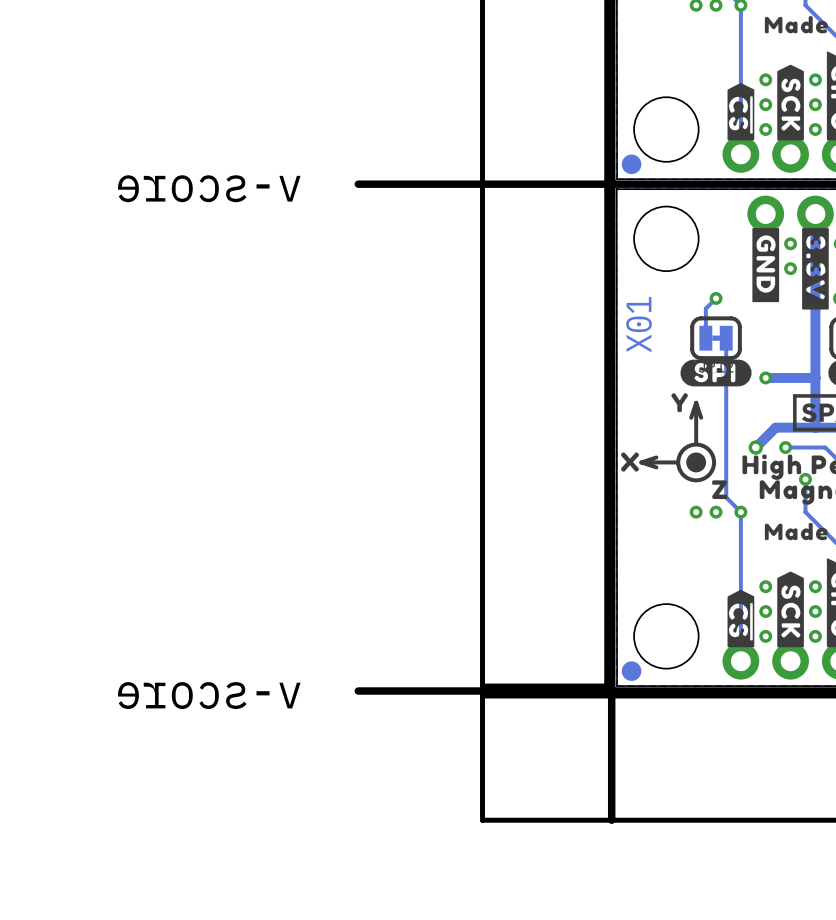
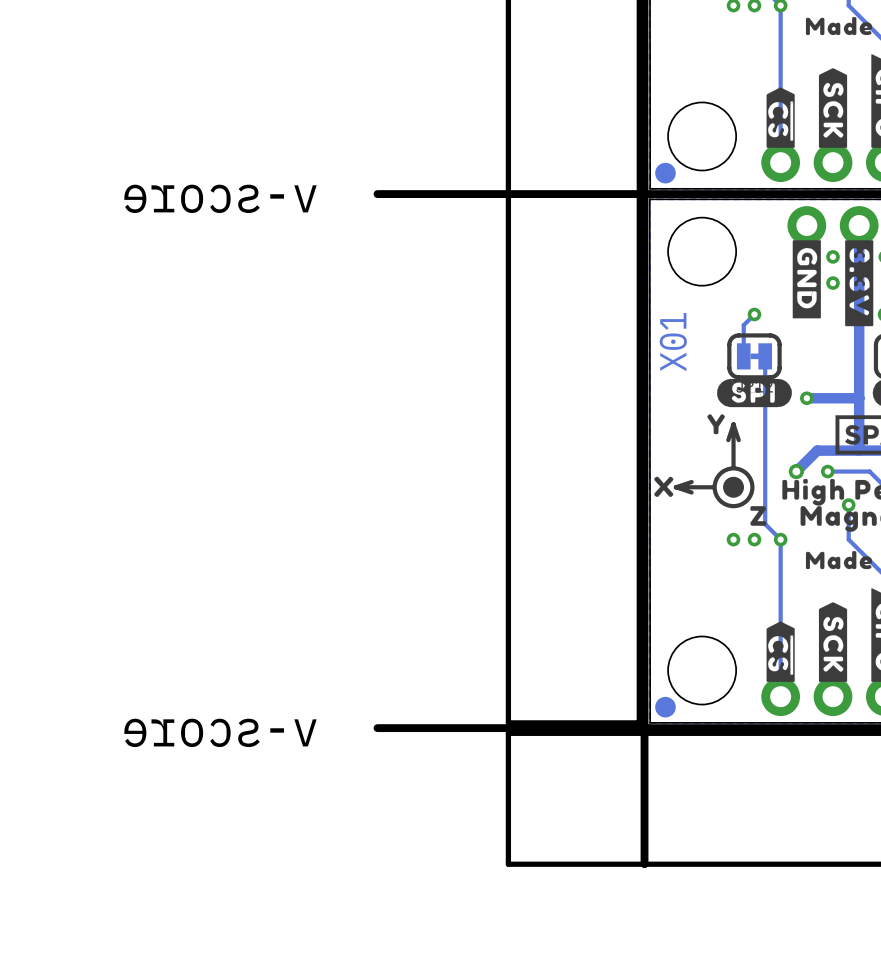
via: (765, 79) -> none
via: (815, 79) -> none
via: (765, 104) -> none
via: (815, 104) -> none
via: (765, 129) -> none
via: (815, 129) -> none
via: (765, 586) -> none
via: (815, 586) -> none
via: (765, 611) -> none
via: (815, 611) -> none
via: (765, 636) -> none
via: (815, 636) -> none

